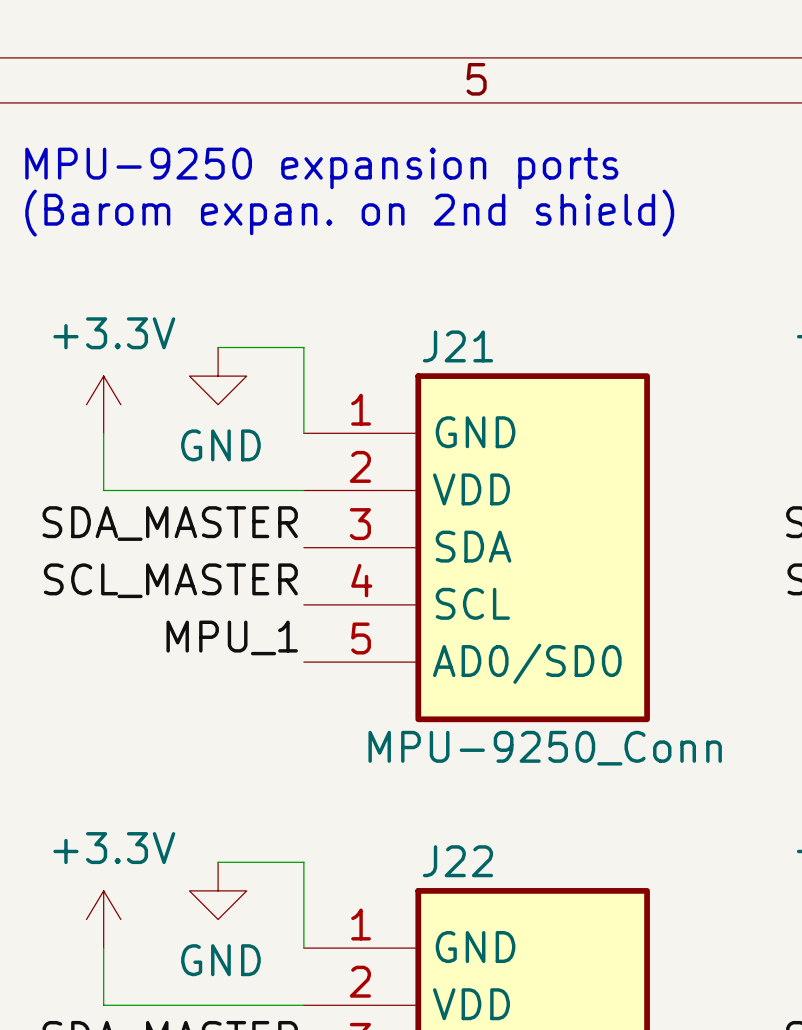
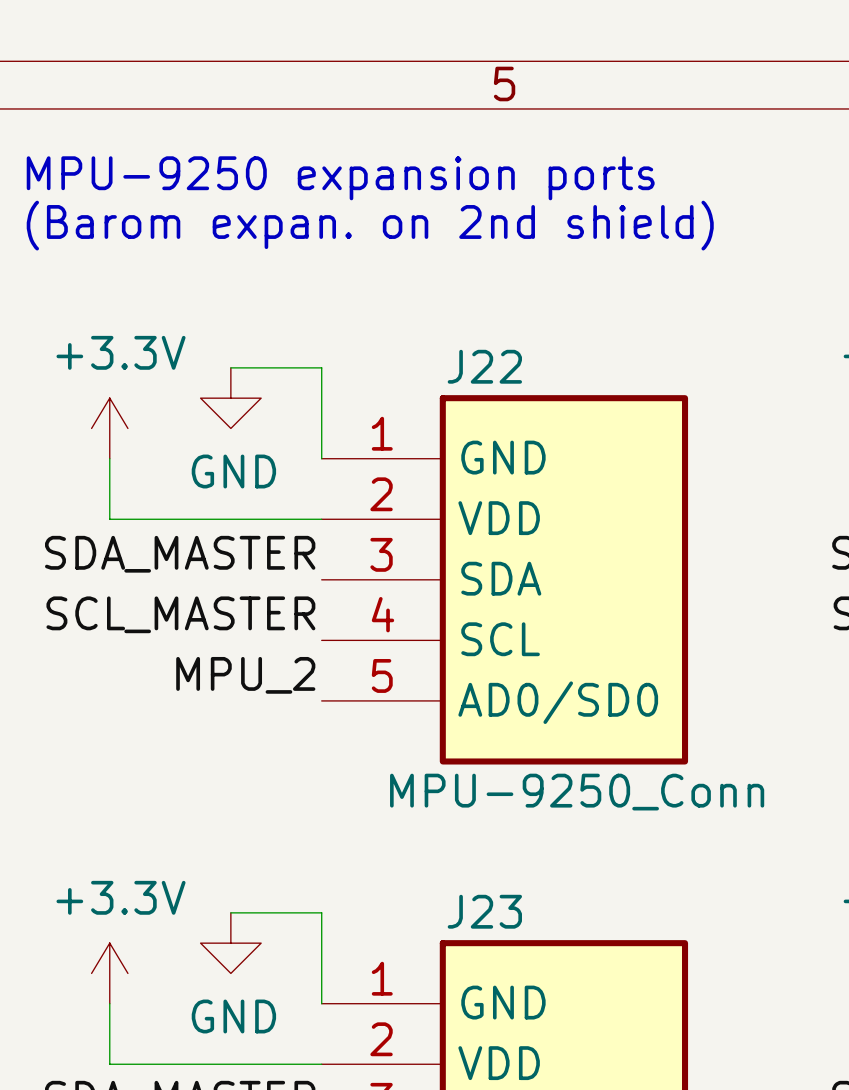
J21 name: J21 (457, 346) -> J22 (484, 366)
label: MPU_1 (232, 637) -> MPU_2 (245, 675)
J22 name: J22 (457, 861) -> J23 (484, 911)

